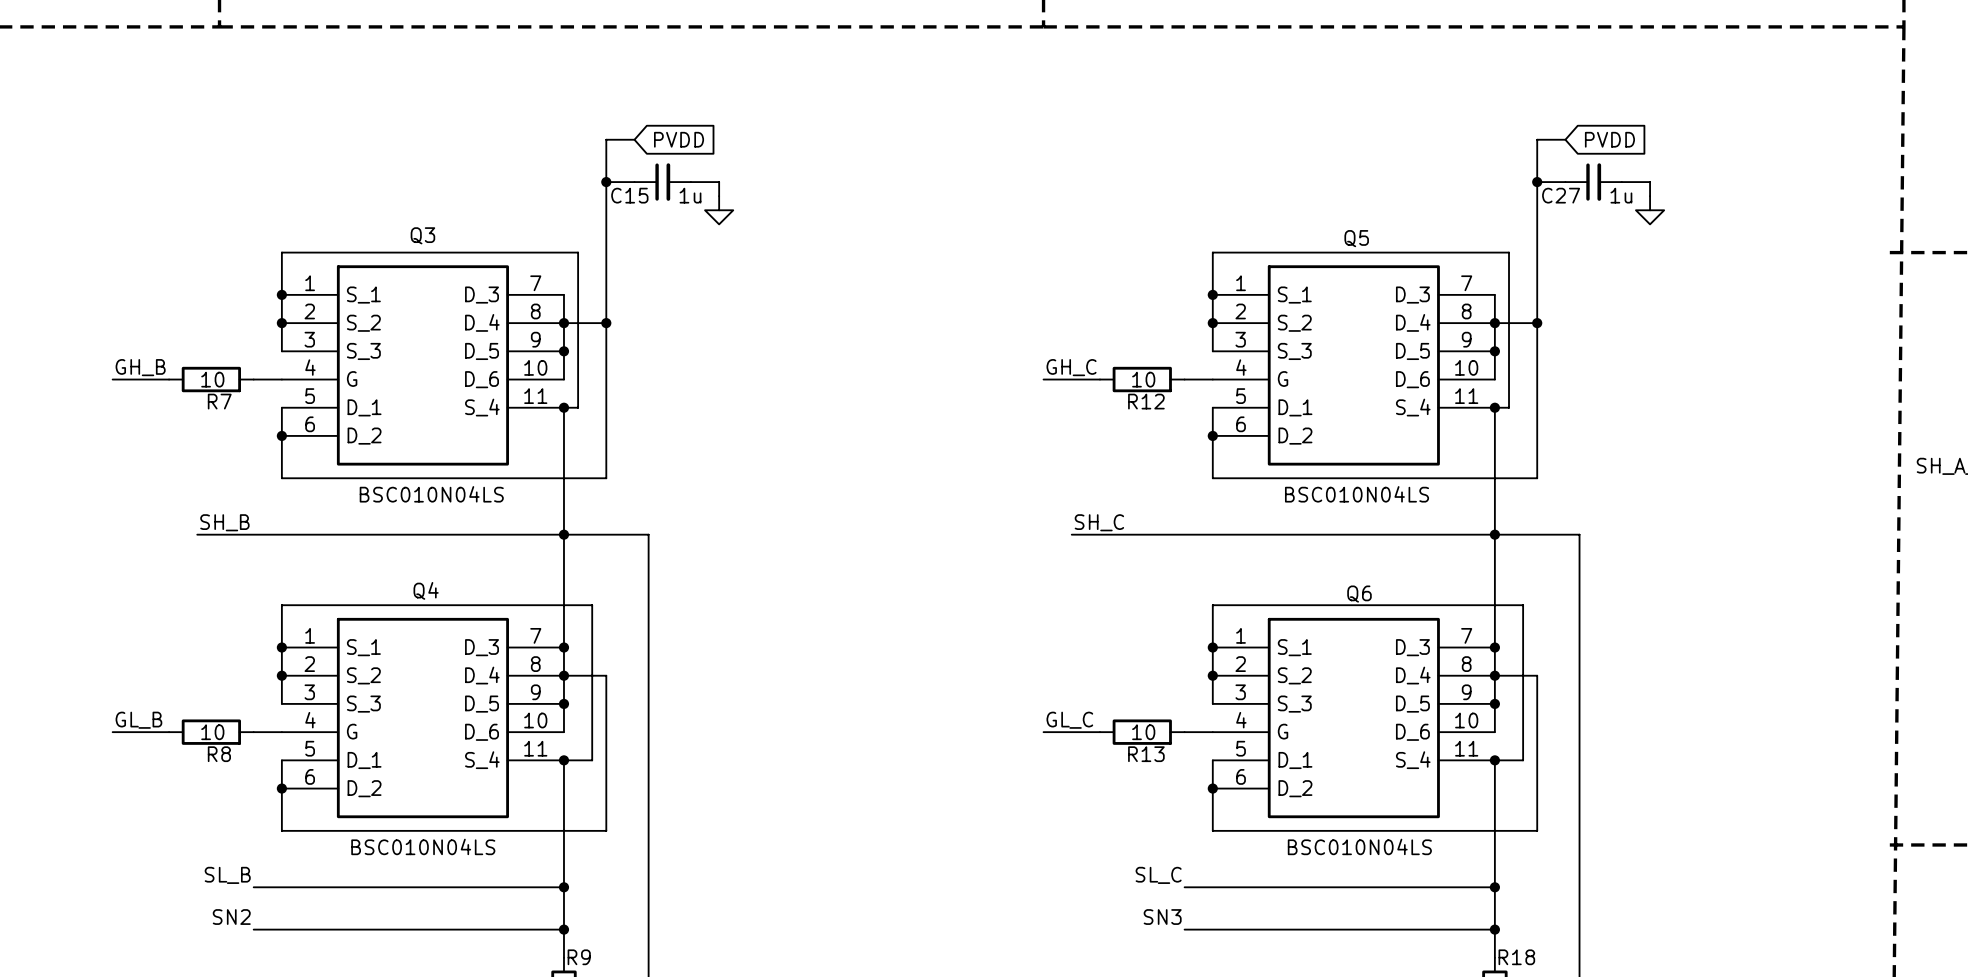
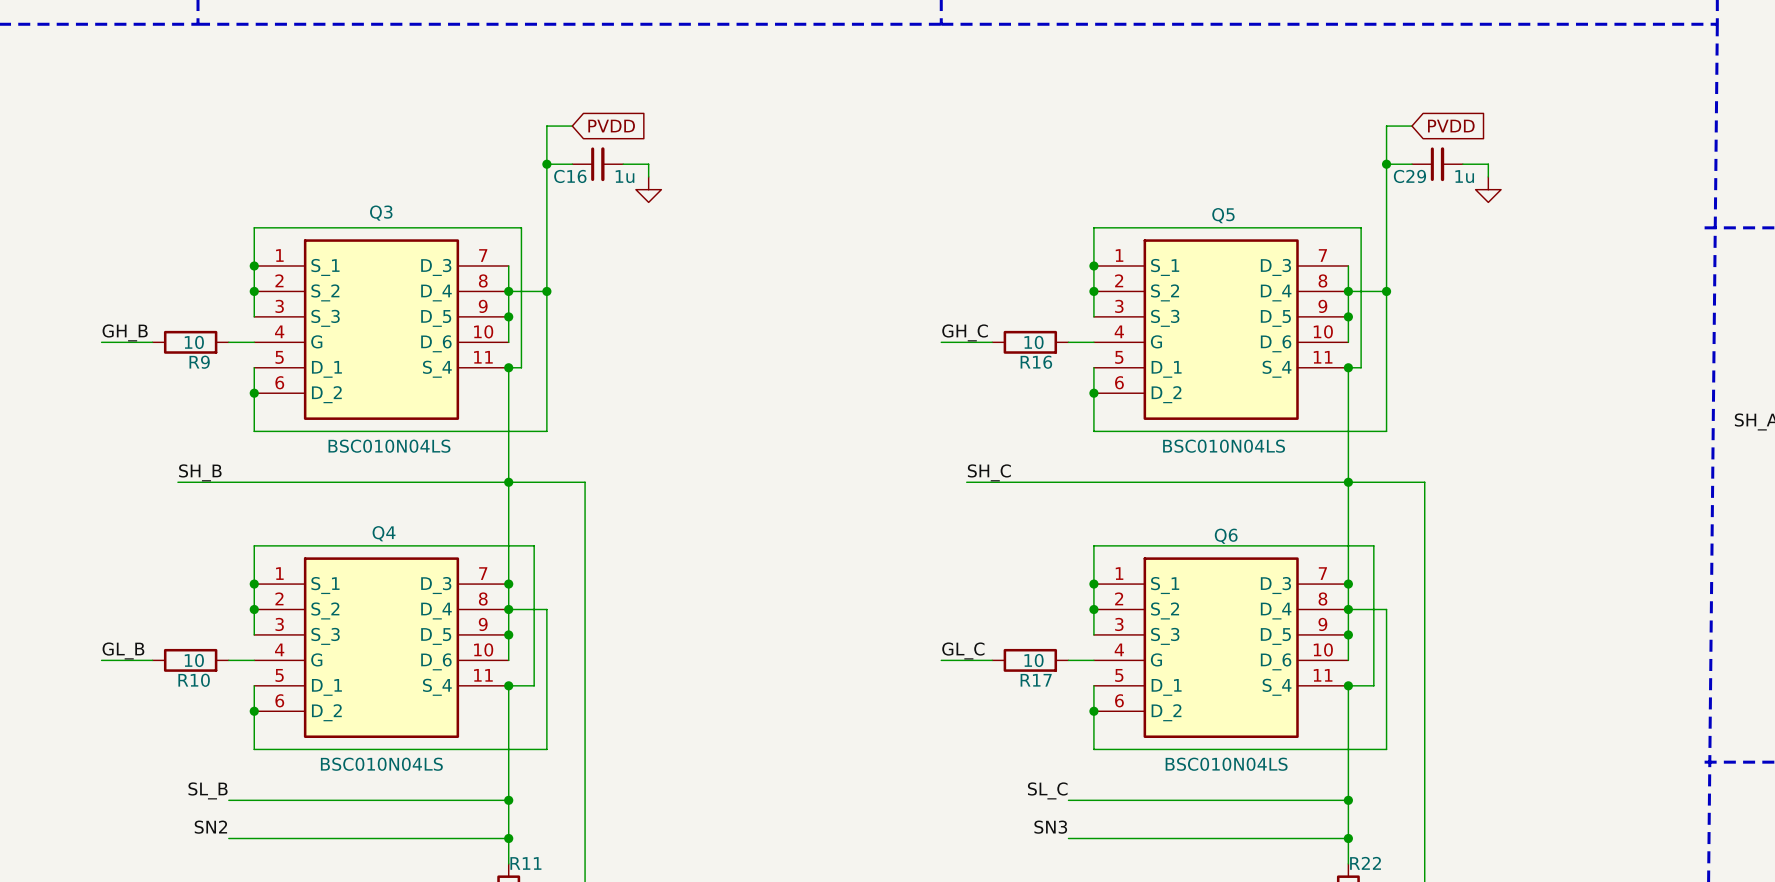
C15 name: C15 (629, 195) -> C16 (570, 176)
C27 name: C27 (1561, 195) -> C29 (1409, 176)
R7 name: R7 (219, 401) -> R9 (199, 362)
R12 name: R12 (1146, 401) -> R16 (1036, 362)
R8 name: R8 (219, 754) -> R10 (194, 680)
R13 name: R13 (1146, 754) -> R17 (1036, 680)
R9 name: R9 (579, 957) -> R11 (525, 863)
R18 name: R18 (1516, 957) -> R22 (1365, 863)

